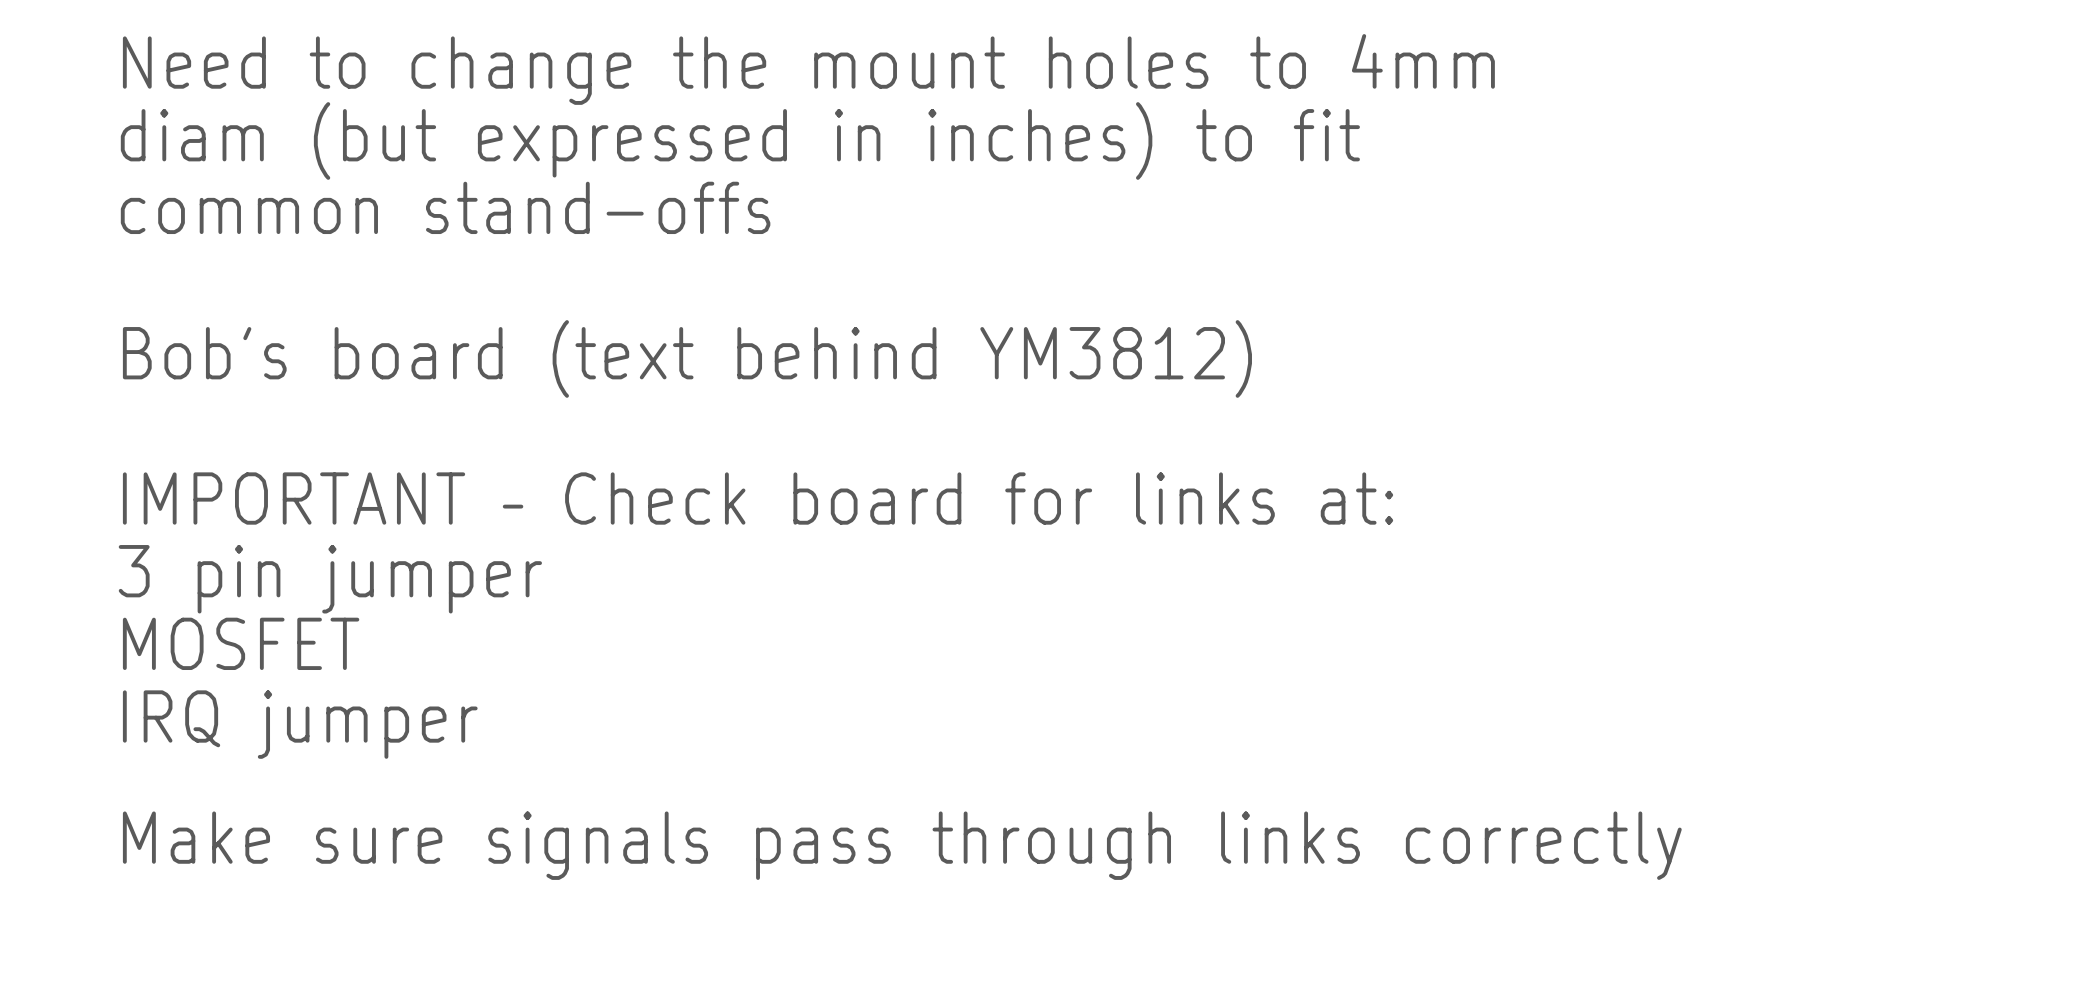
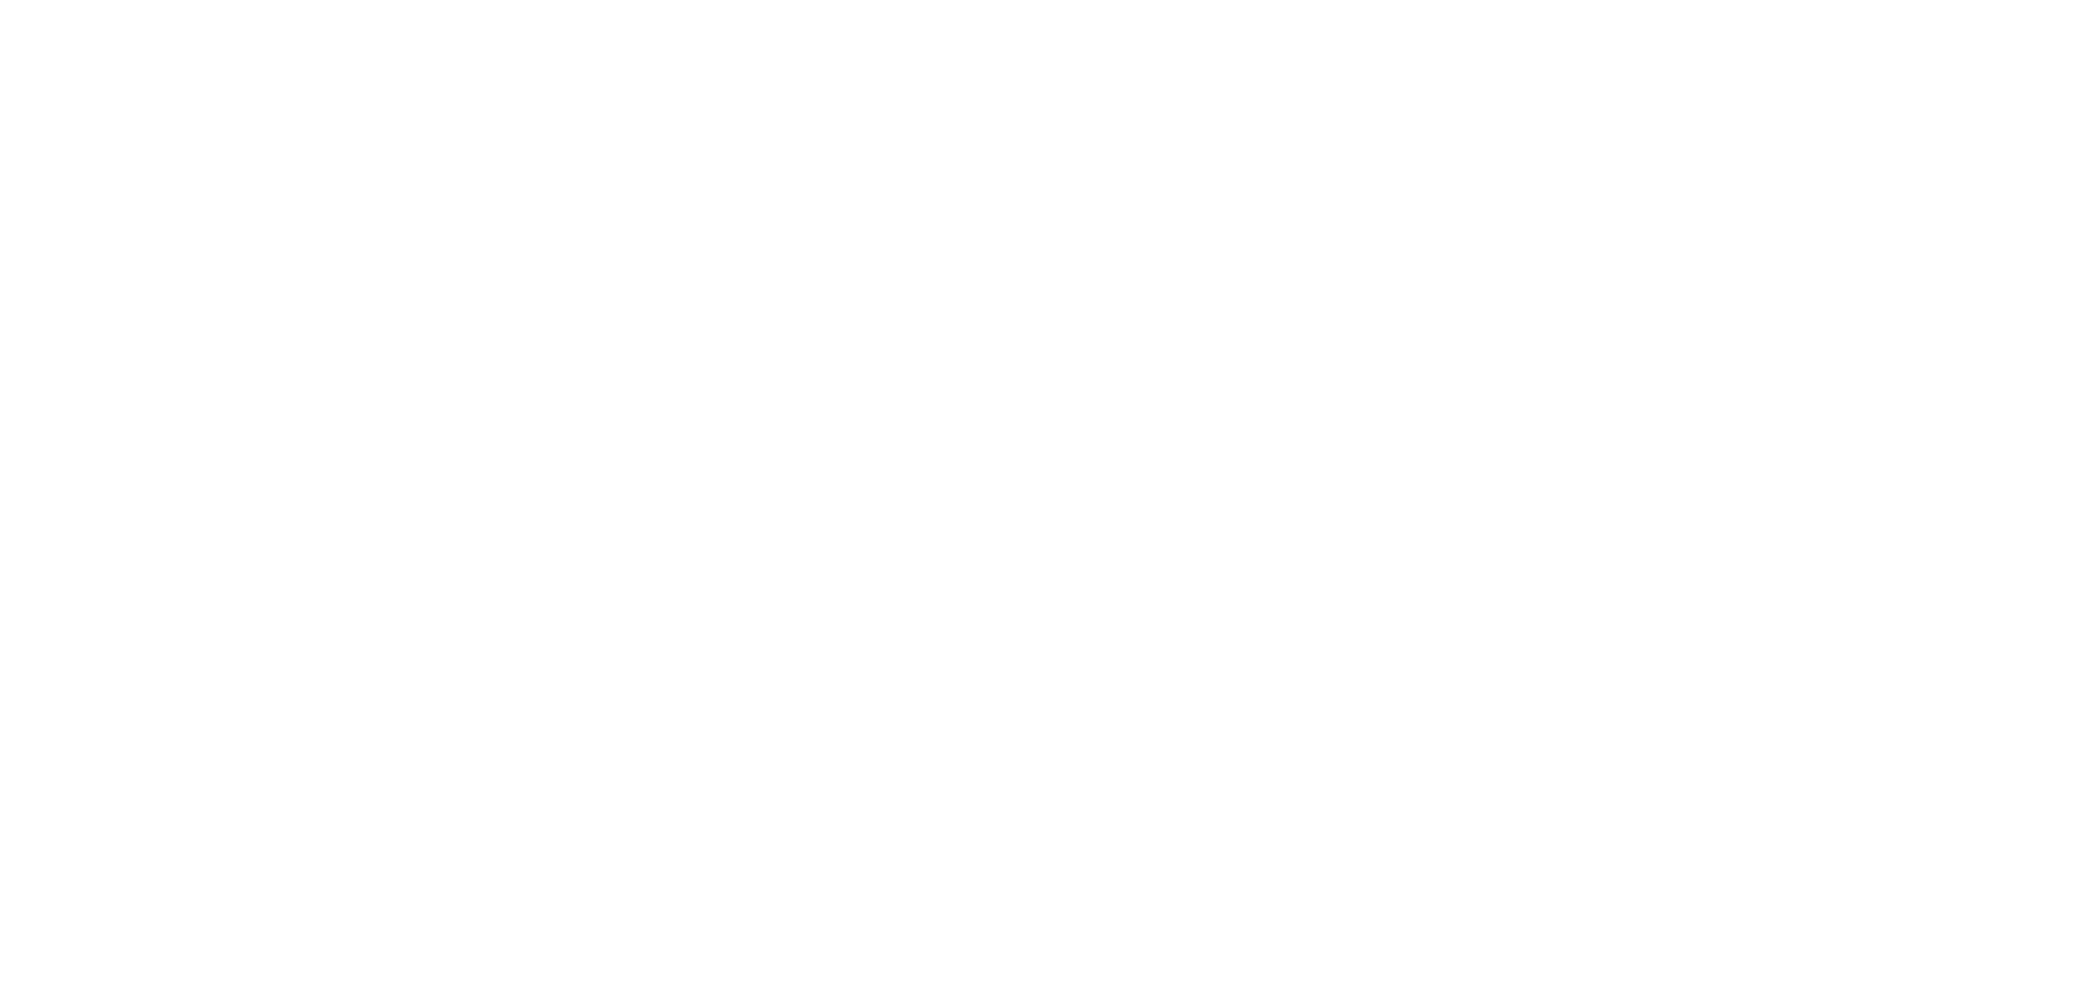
text: Need to change the mount holes to 4mm (808, 69) -> none
text: diam (but expressed in inches) to fit (740, 140) -> none
text: common stand-offs (445, 207) -> none
text: Bob's board (text behind YM3812) (687, 358) -> none
text: IMPORTANT – Check board for links at: (758, 498) -> none
text: 3 pin jumper (330, 579) -> none
text: MOSFET (241, 643) -> none
text: IRQ jumper (300, 724) -> none
text: Make sure signals pass through links correctly (902, 845) -> none

